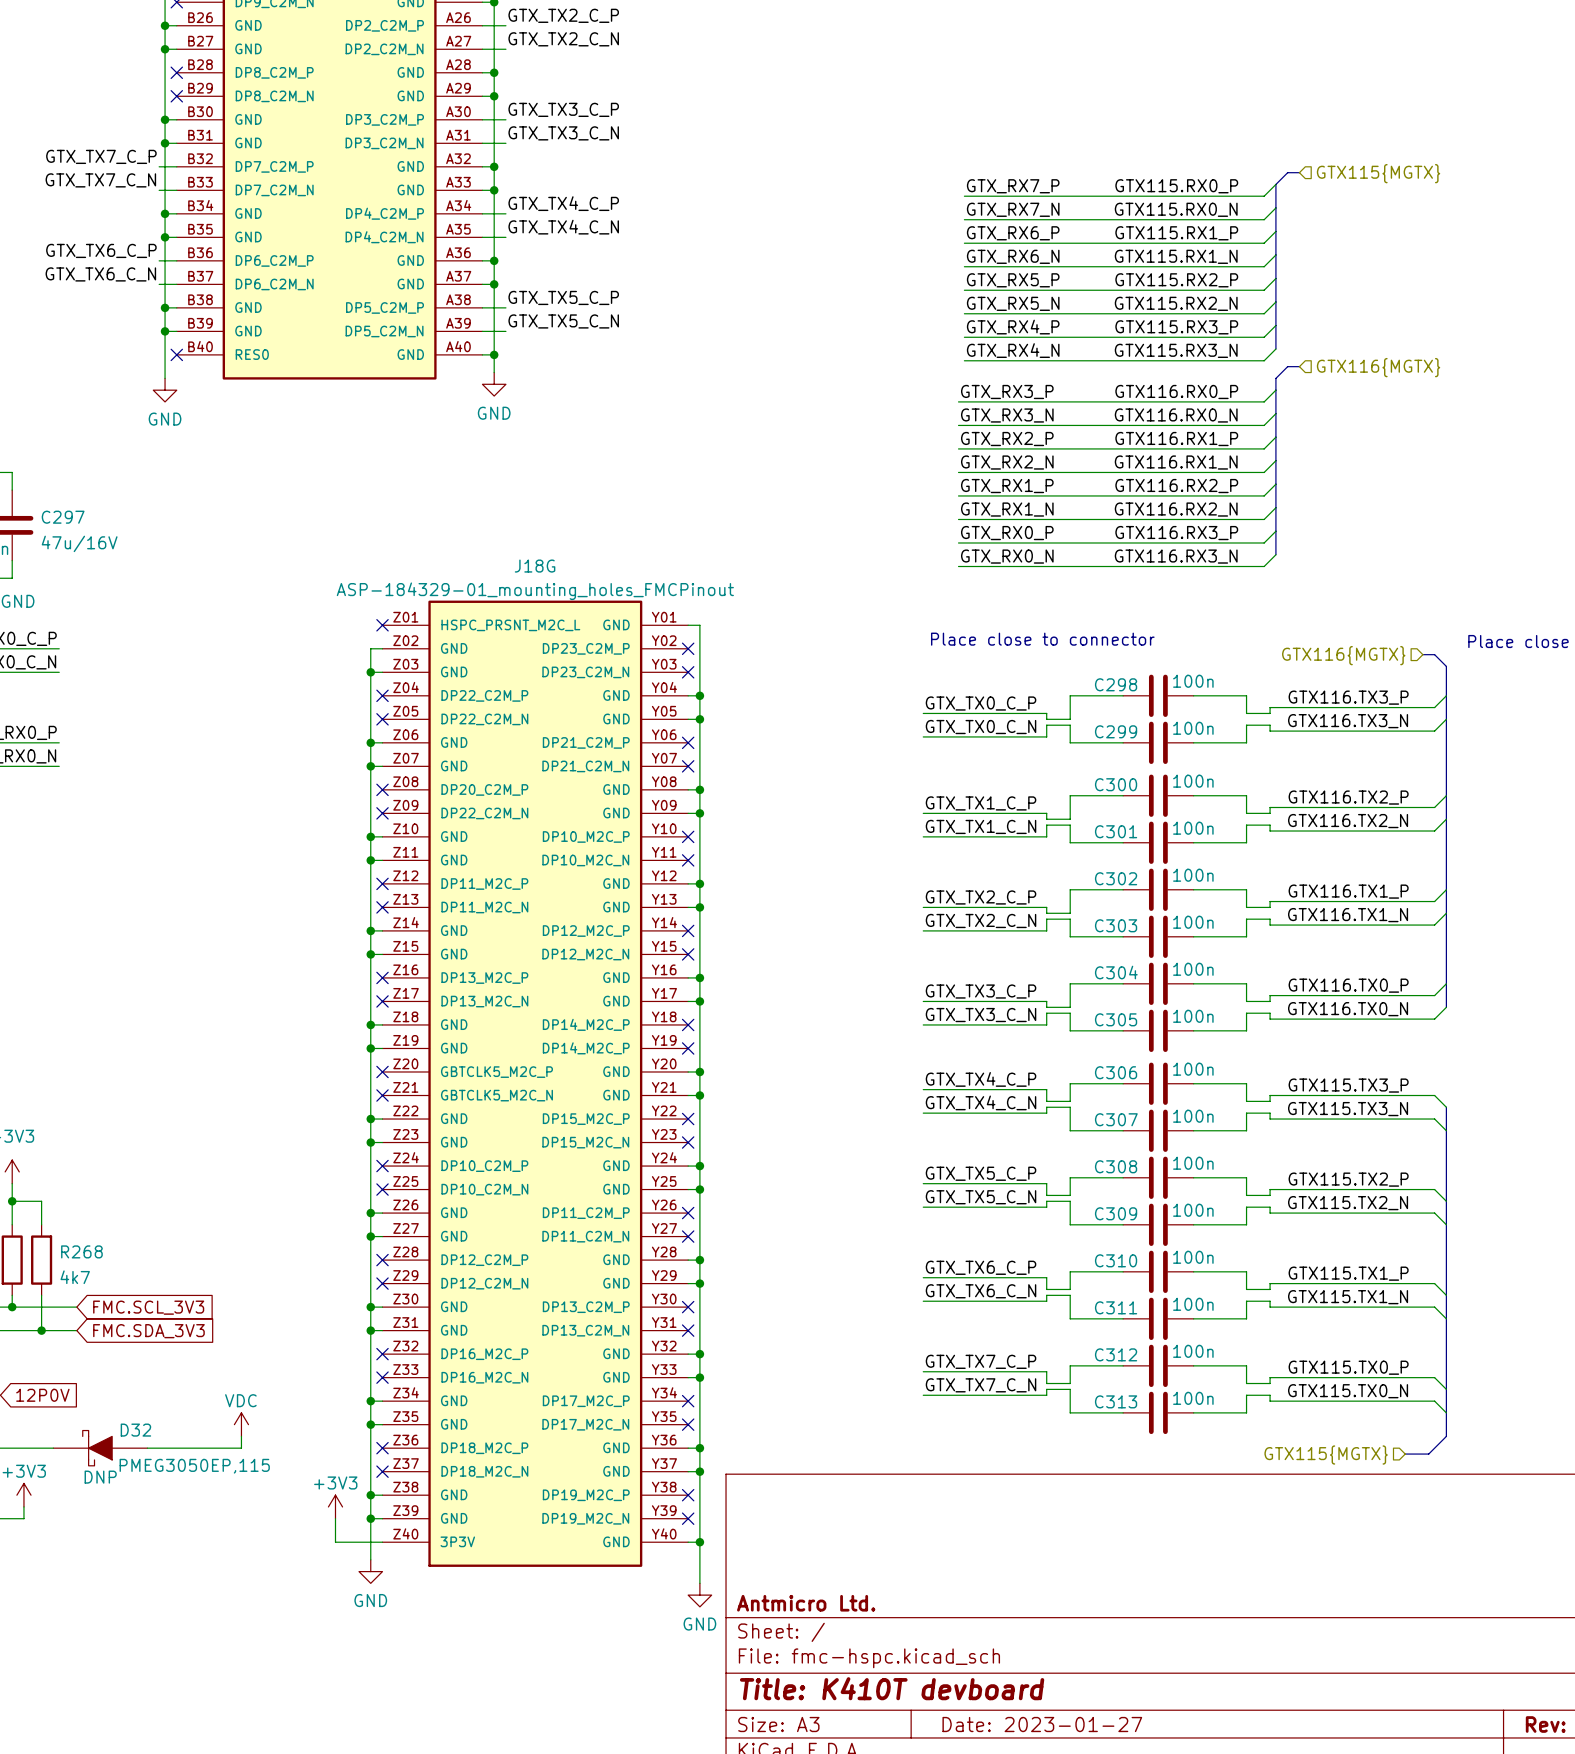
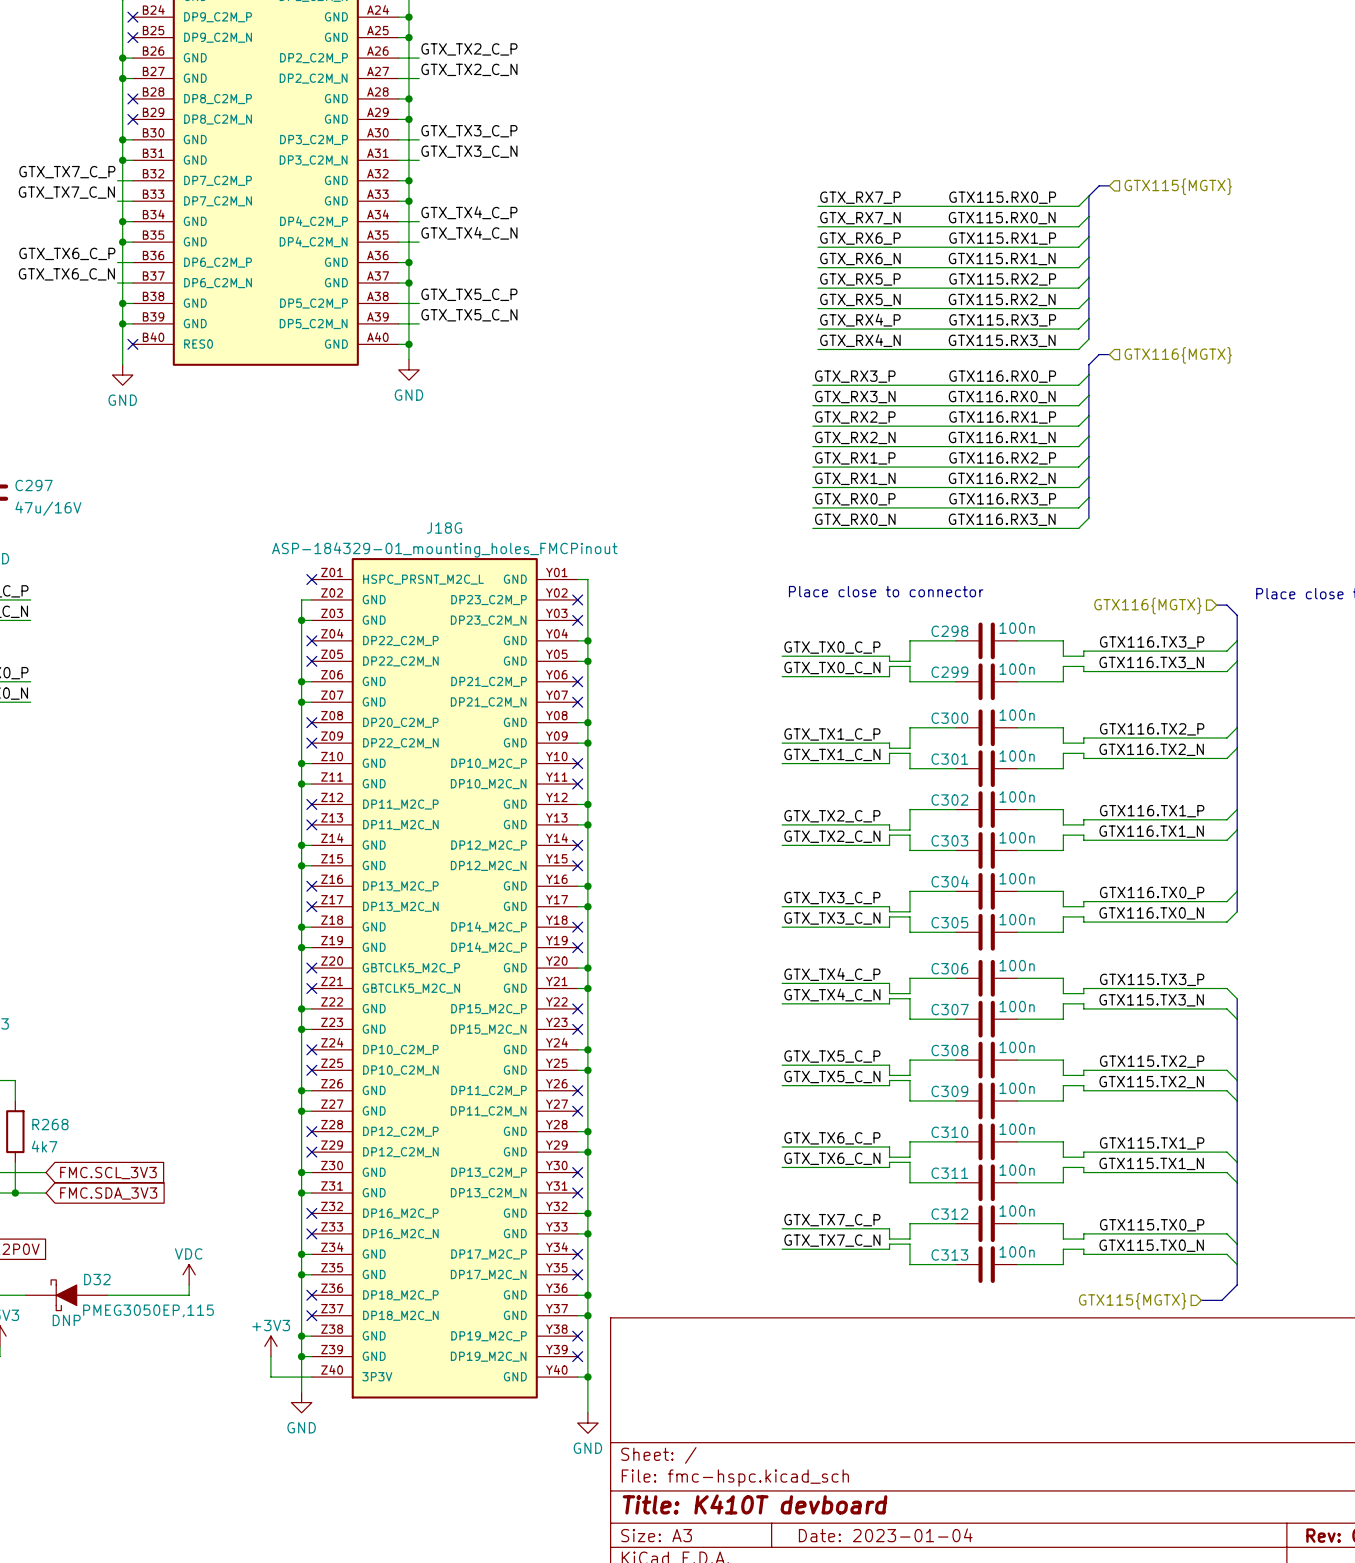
title block: Antmicro Ltd. (806, 1603) -> none
title block: Date: 2023-01-27 (1042, 1724) -> Date: 2023-01-04 (885, 1535)

